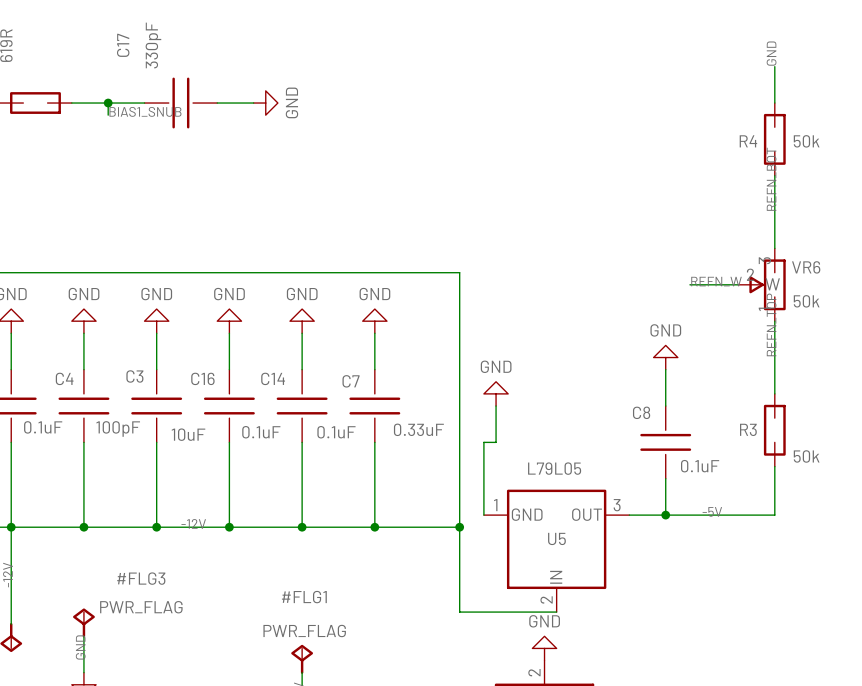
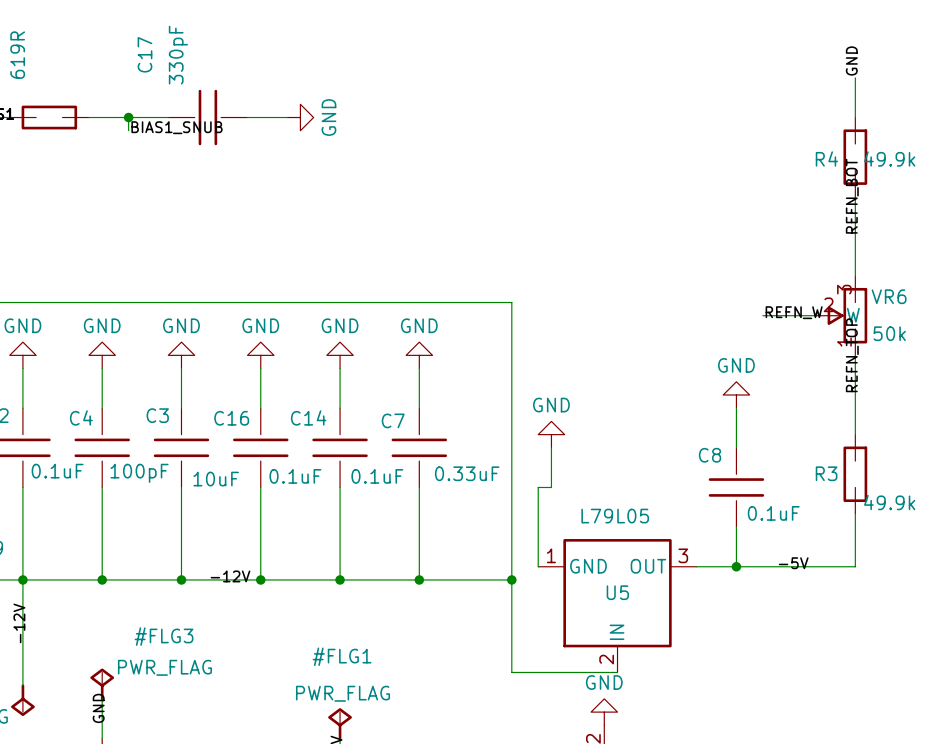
R4 value: 50k (806, 141) -> 49.9k (889, 158)
R3 value: 50k (806, 456) -> 49.9k (889, 502)

